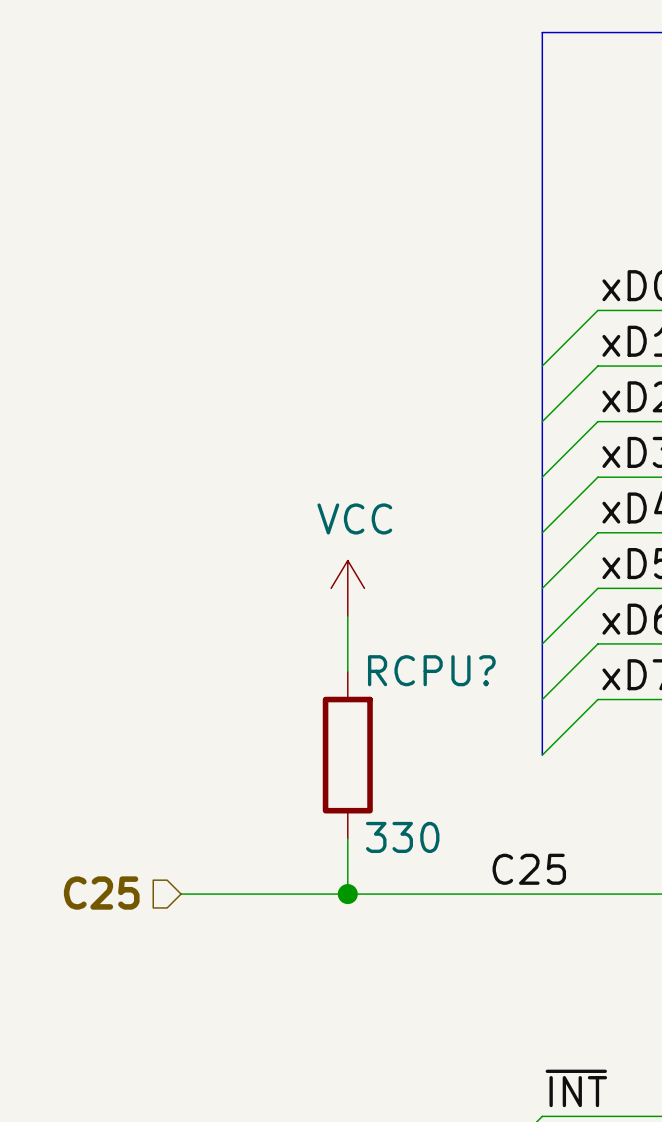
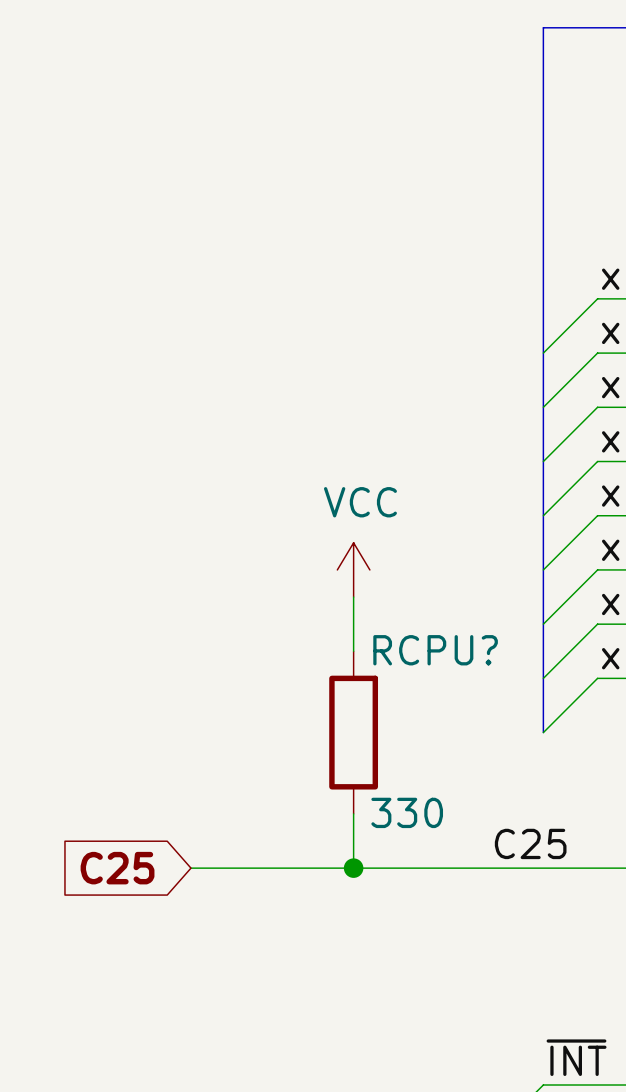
hierarchical label: C25 (101, 893) -> none
global label: none -> C25 (117, 868)

